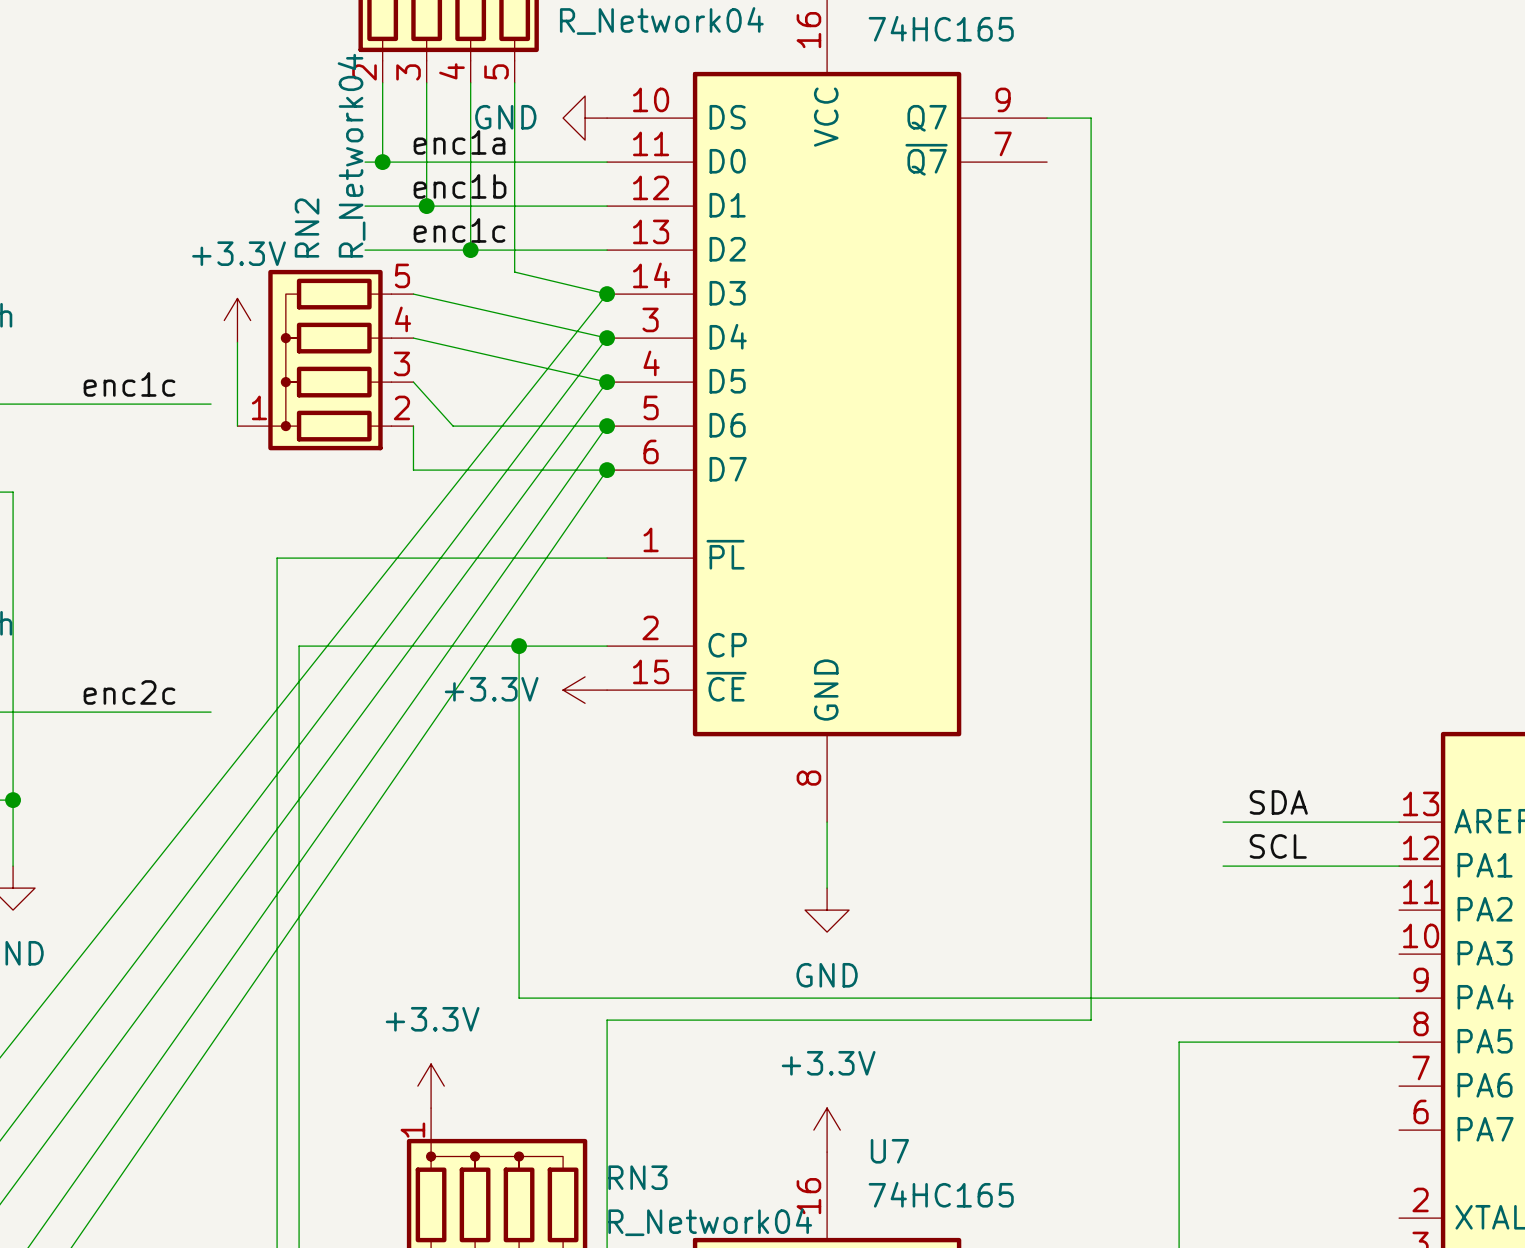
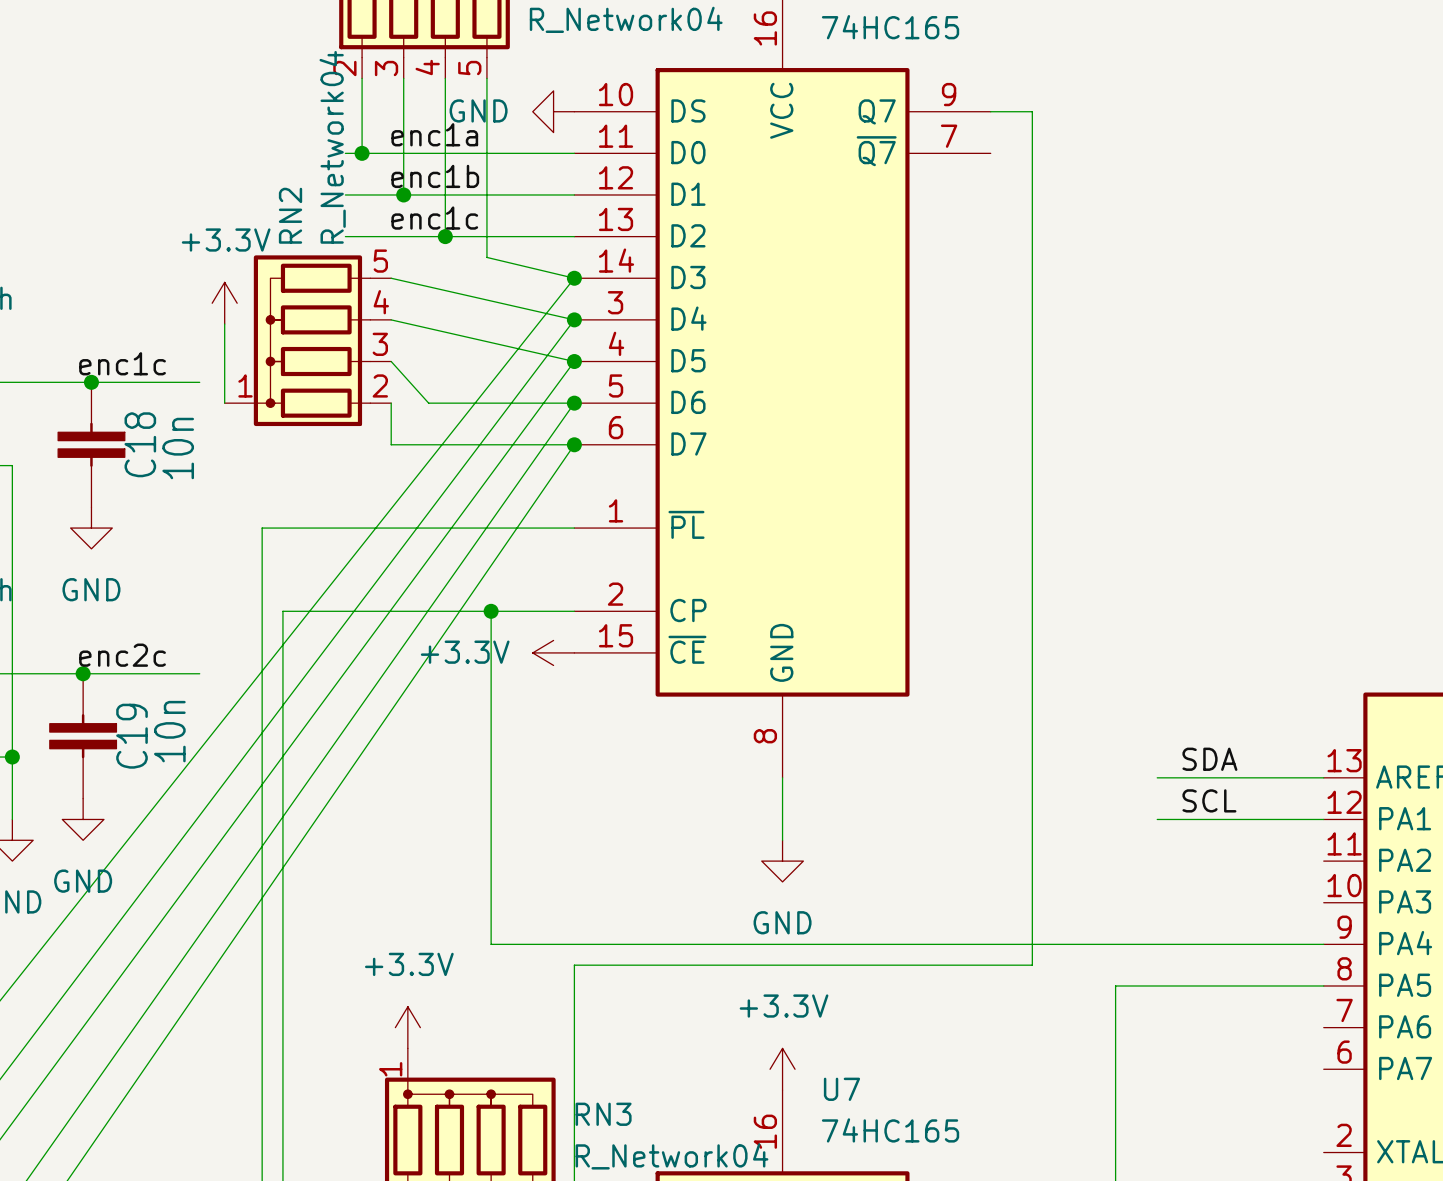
junction: none -> (91, 382)
C18: none -> 10n (91, 444)
power symbol: none -> GND (91, 528)
junction: none -> (83, 673)
C19: none -> 10n (83, 736)
power symbol: none -> GND (83, 819)

